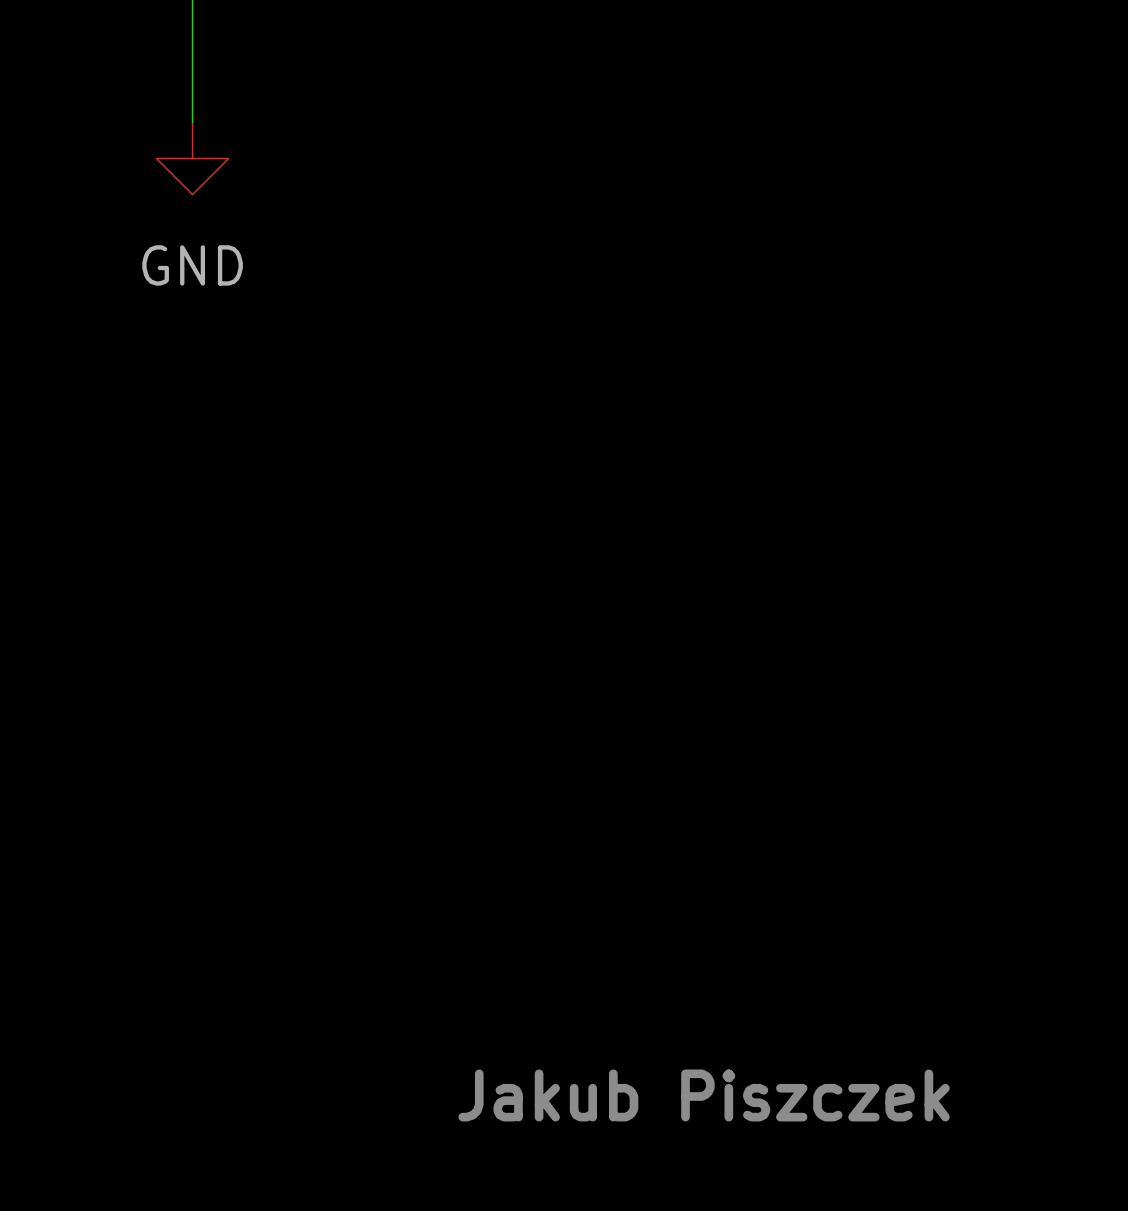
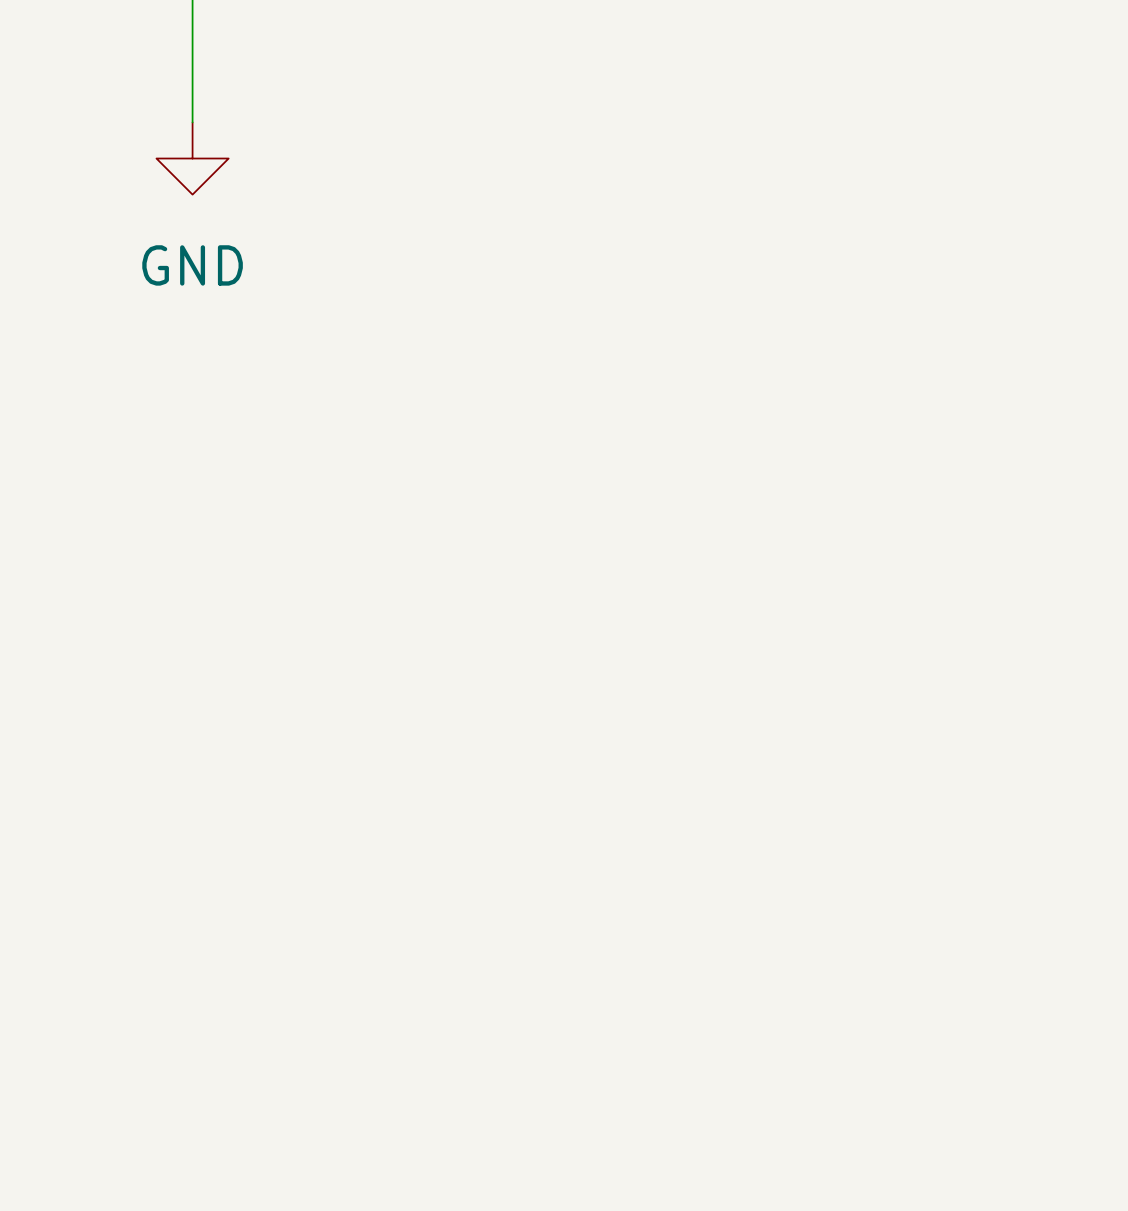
text: Jakub Piszczek (704, 1095) -> none

